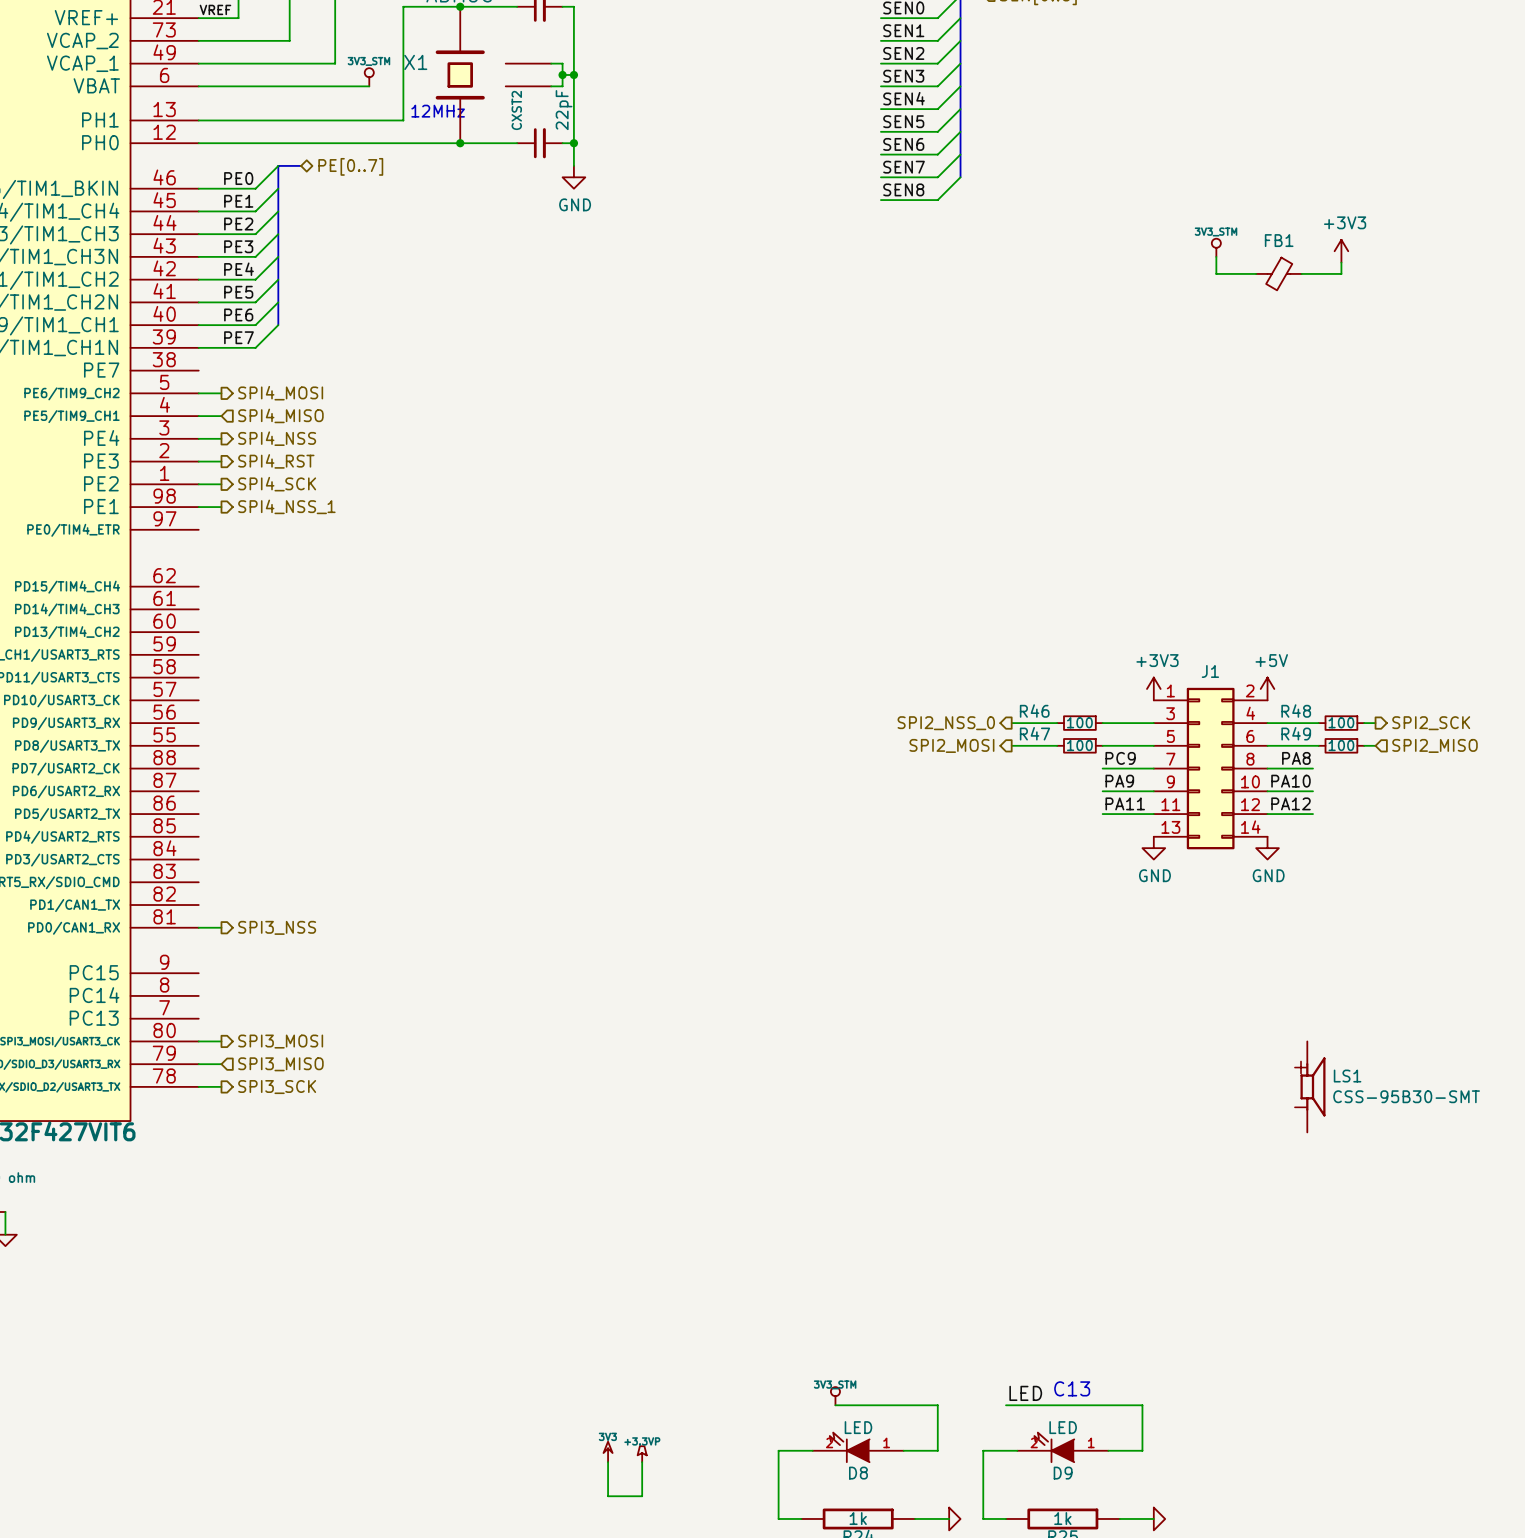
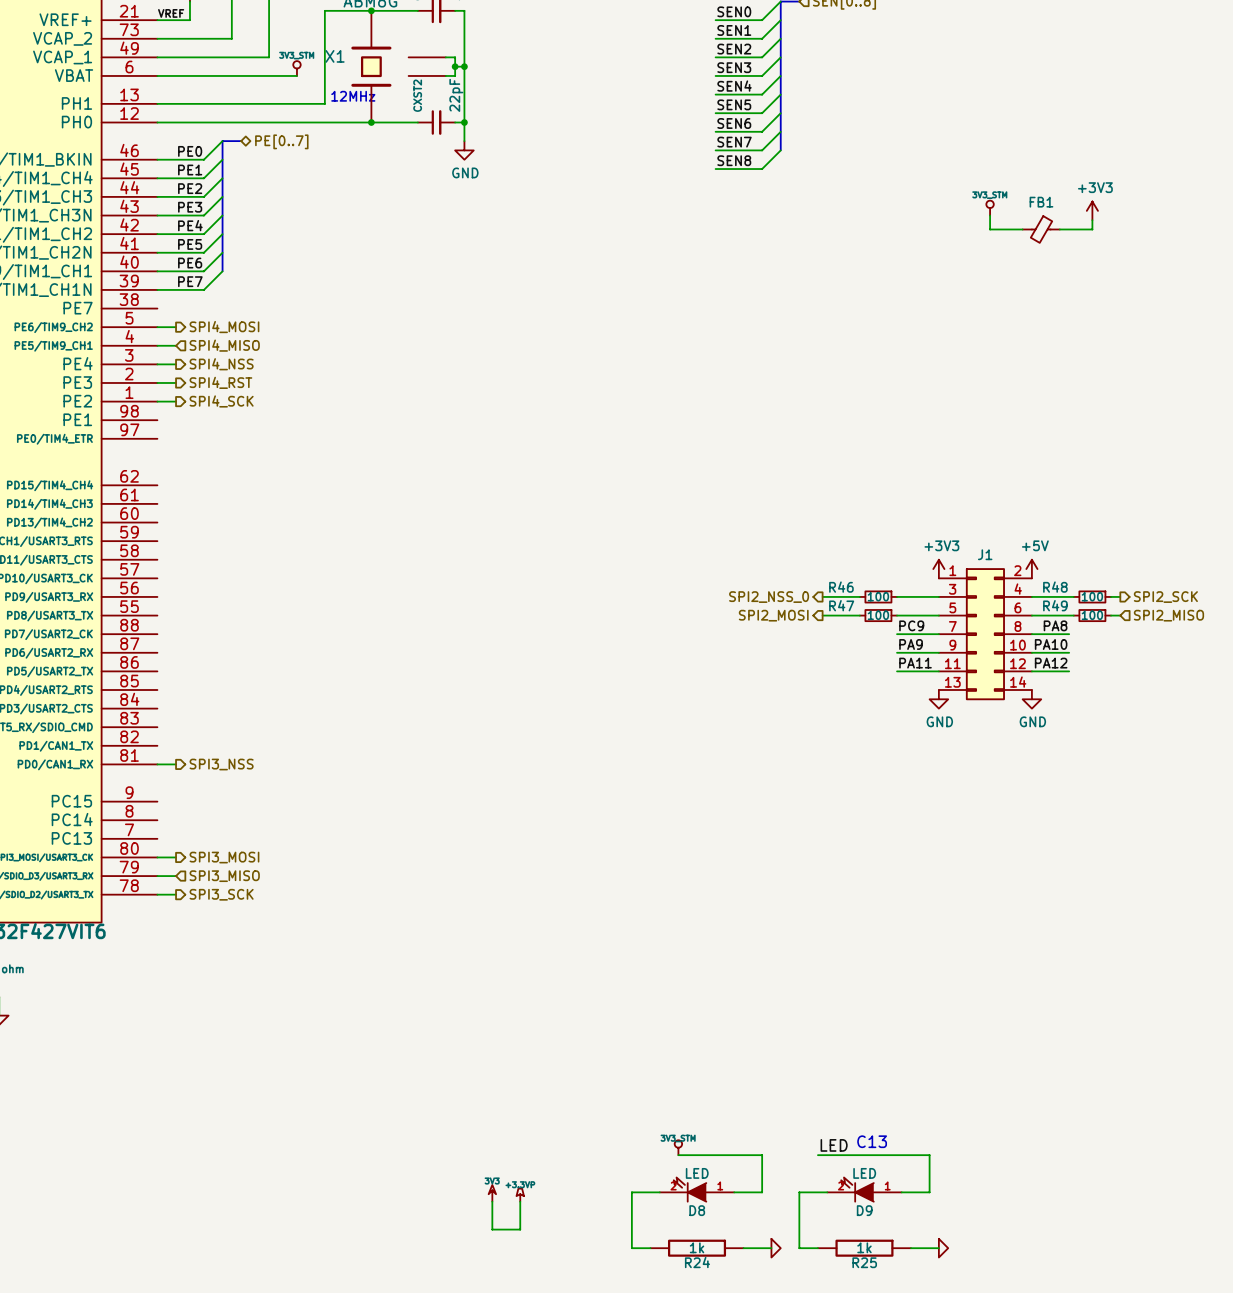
hierarchical label: SPI4_NSS_1 (286, 506) -> none
wire: (198, 507) (221, 507) -> none
LS1: CSS-95B30-SMT (1313, 1086) -> none

